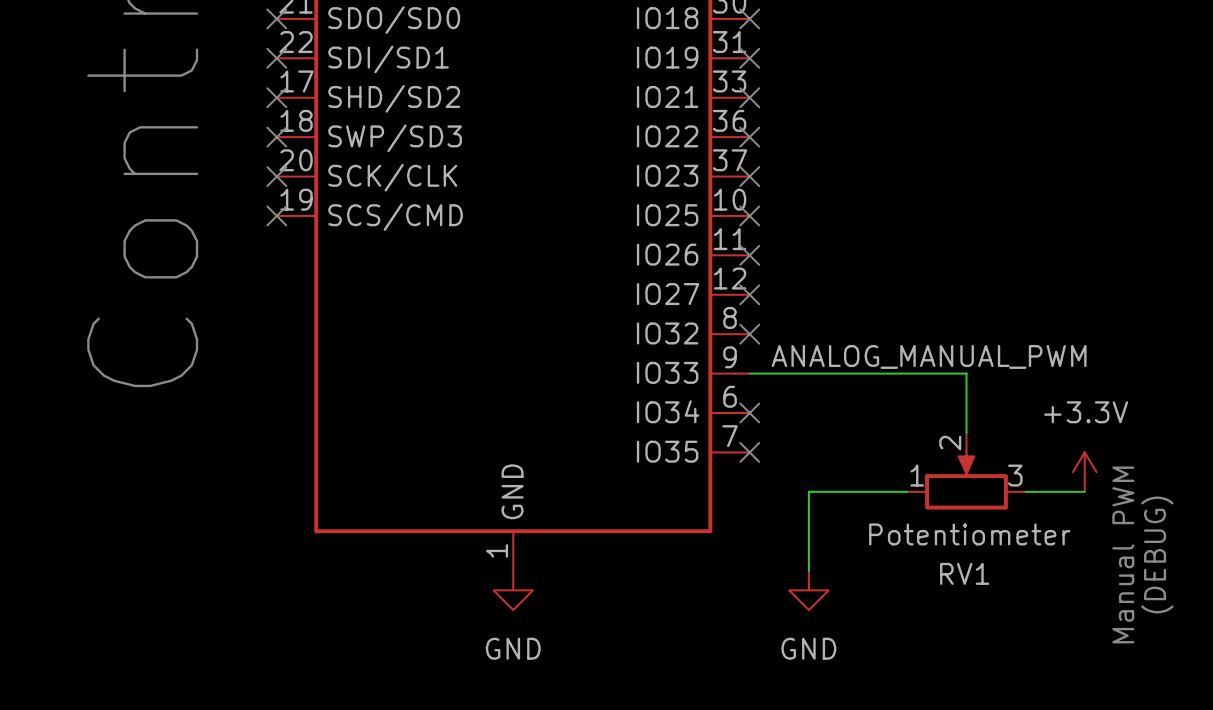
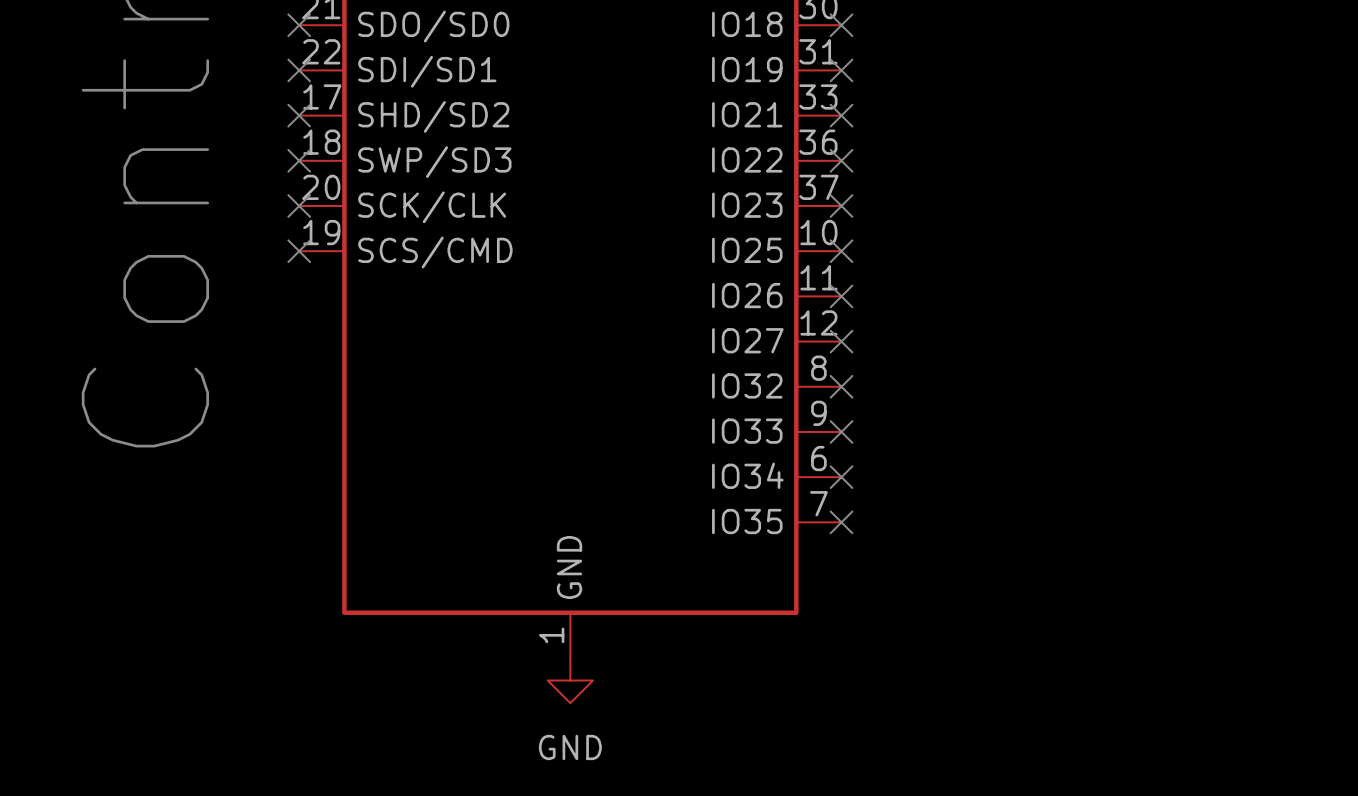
label: ANALOG_MANUAL_PWM (929, 356) -> none
wire: (749, 373) (966, 373) (966, 432) -> none
no-connect mark: none -> (841, 431)
RV1: Potentiometer (966, 471) -> none
power symbol: +3.3V (1084, 472) -> none
wire: (907, 491) (808, 491) (808, 570) -> none
wire: (1025, 491) (1084, 491) -> none
text: Manual PWM (1123, 554) -> none
text: (DEBUG) (1157, 554) -> none
power symbol: GND (808, 590) -> none

